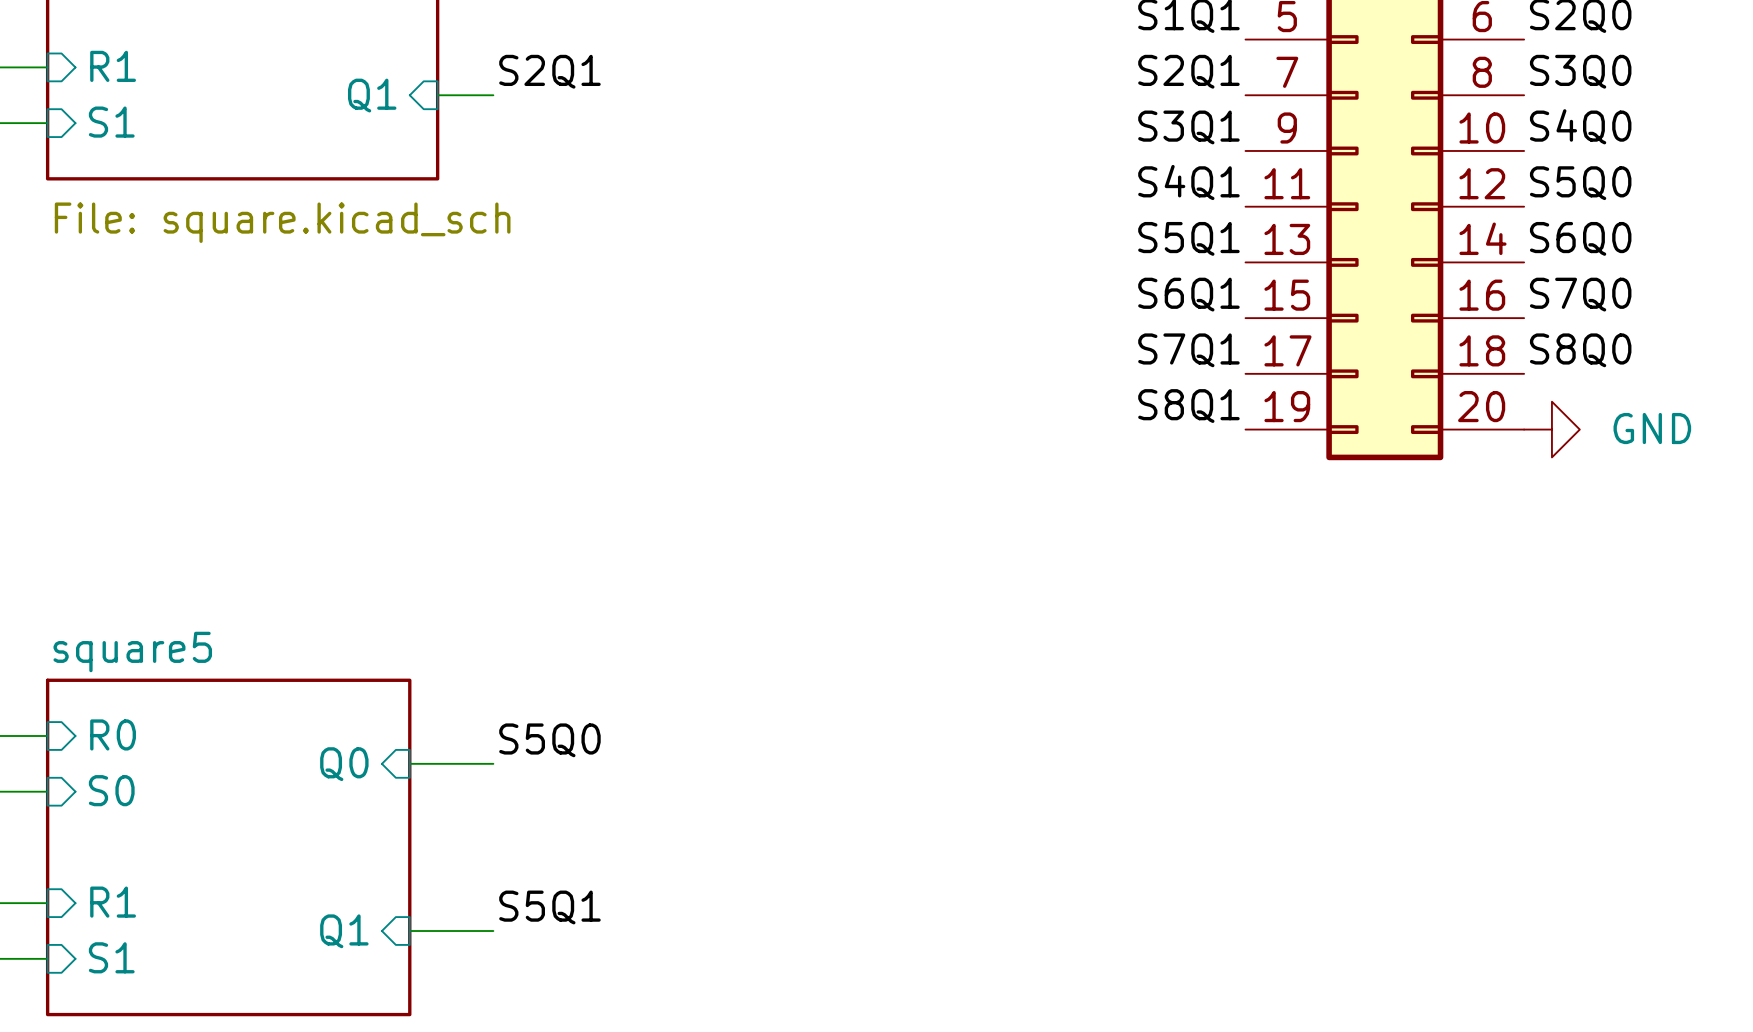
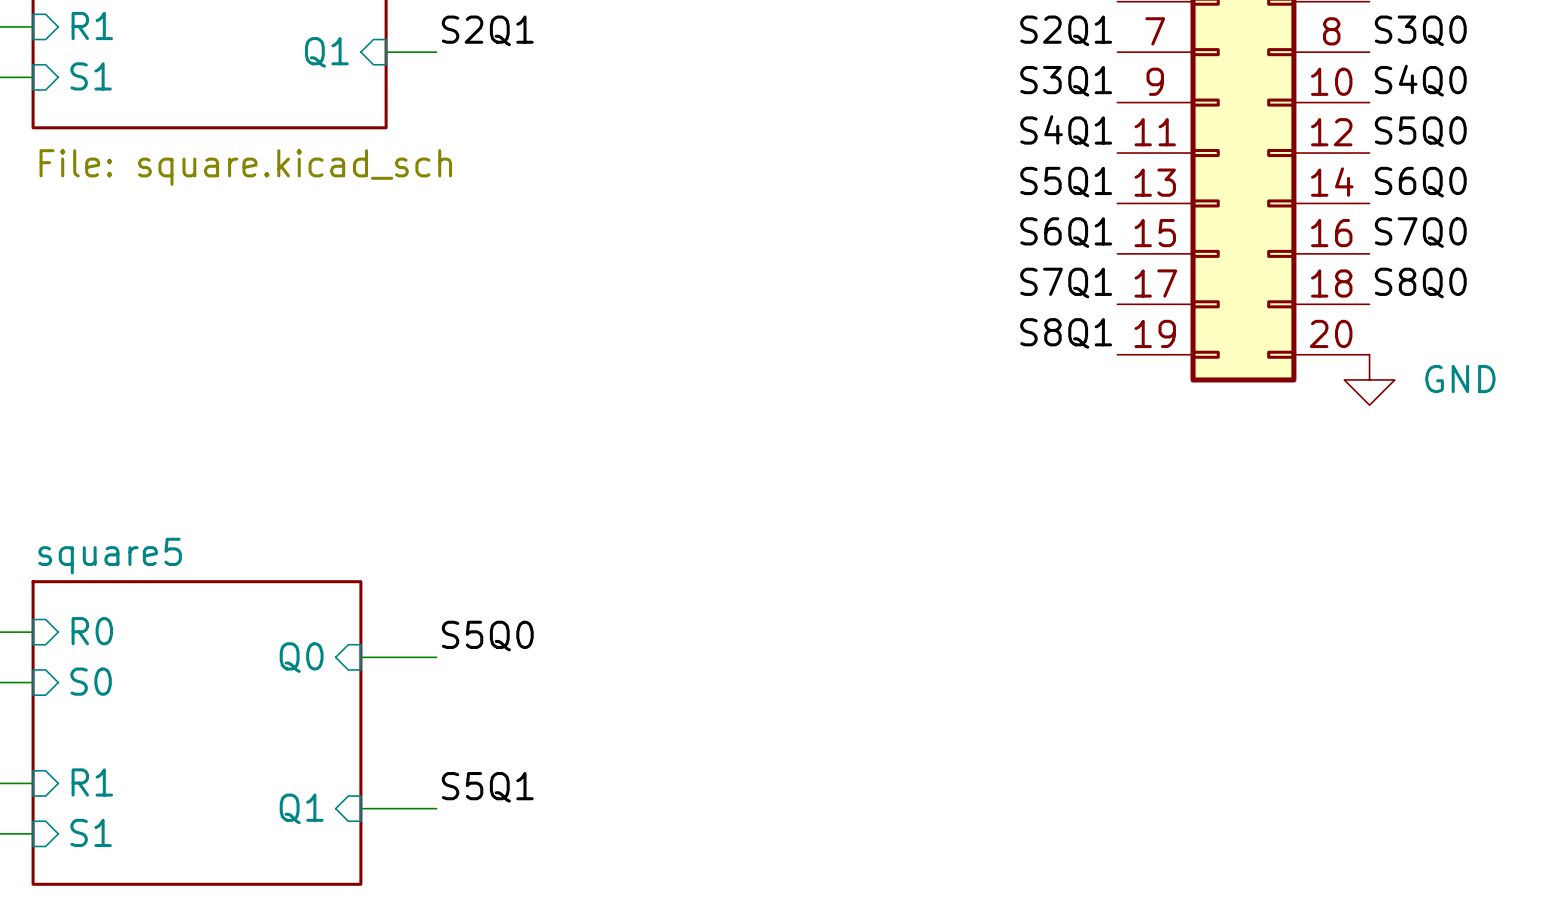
power symbol rotation: 0° (1551, 429) -> 90° clockwise (1369, 379)
power symbol position: GND (1551, 429) -> GND (1369, 379)

